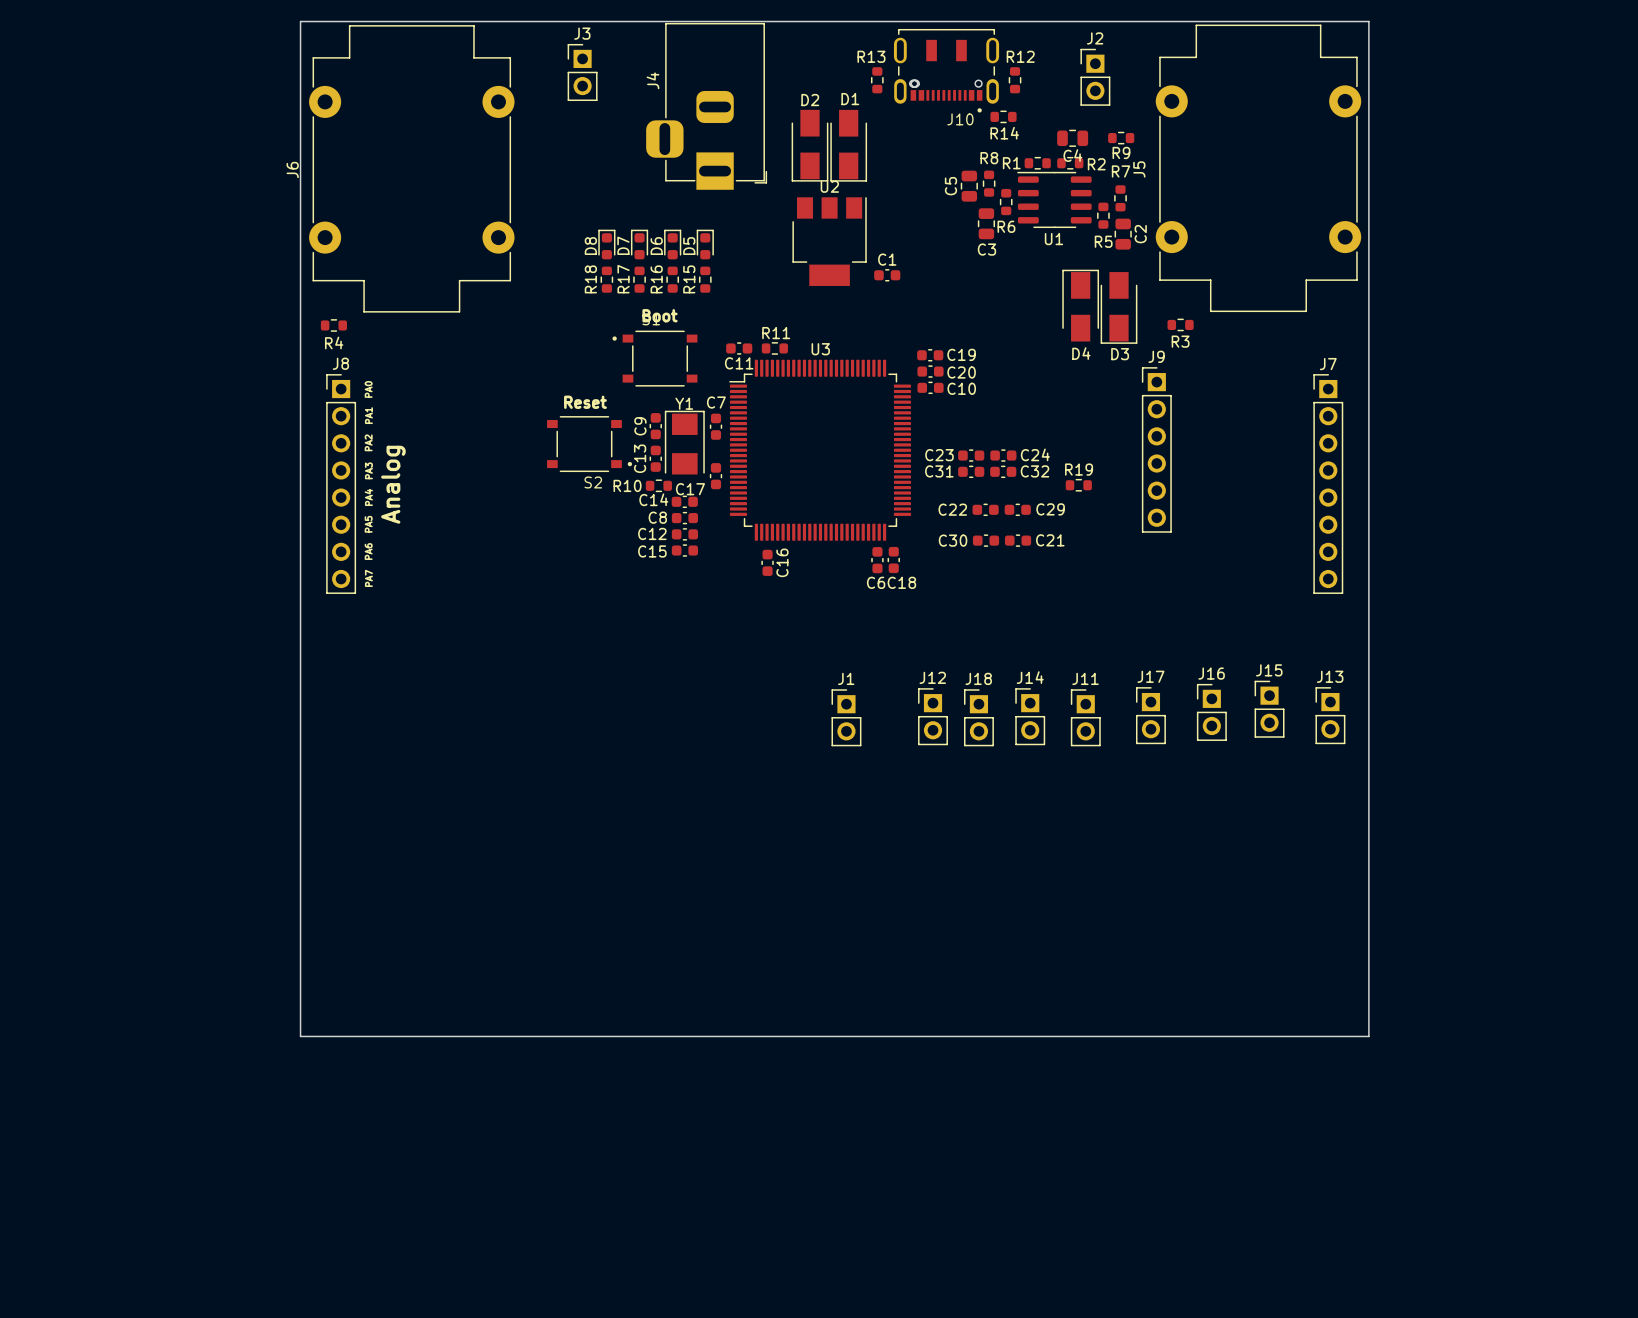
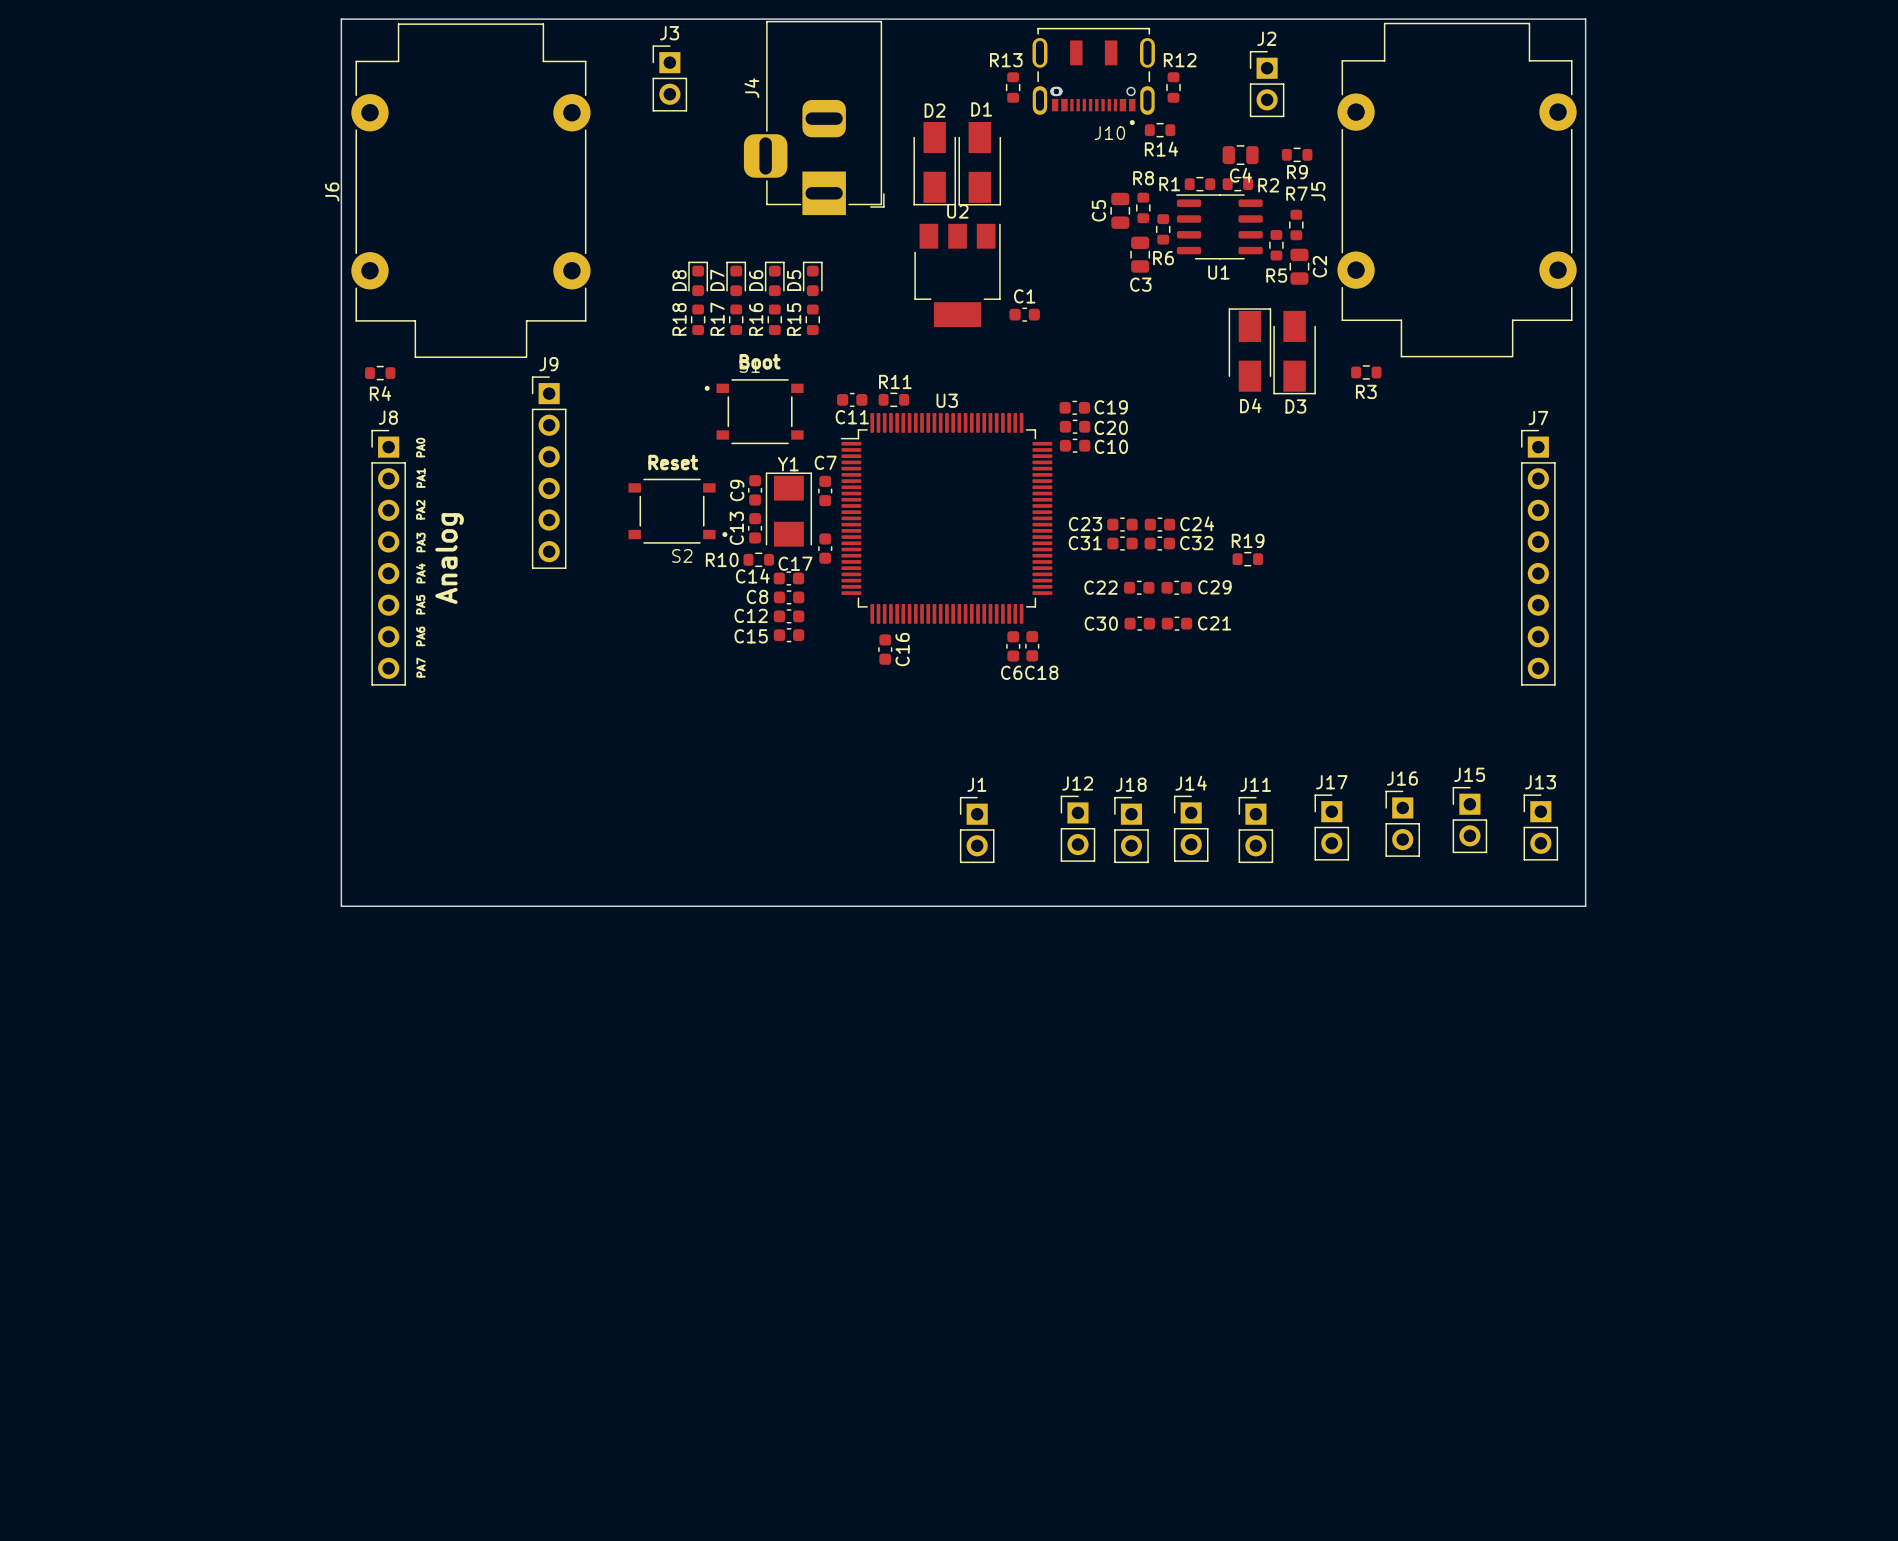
J9 position: (1156, 449) -> (549, 472)
board edge: (300, 783) (300, 1036) (1368, 1036) (1368, 783) -> (341, 906) (1585, 906)

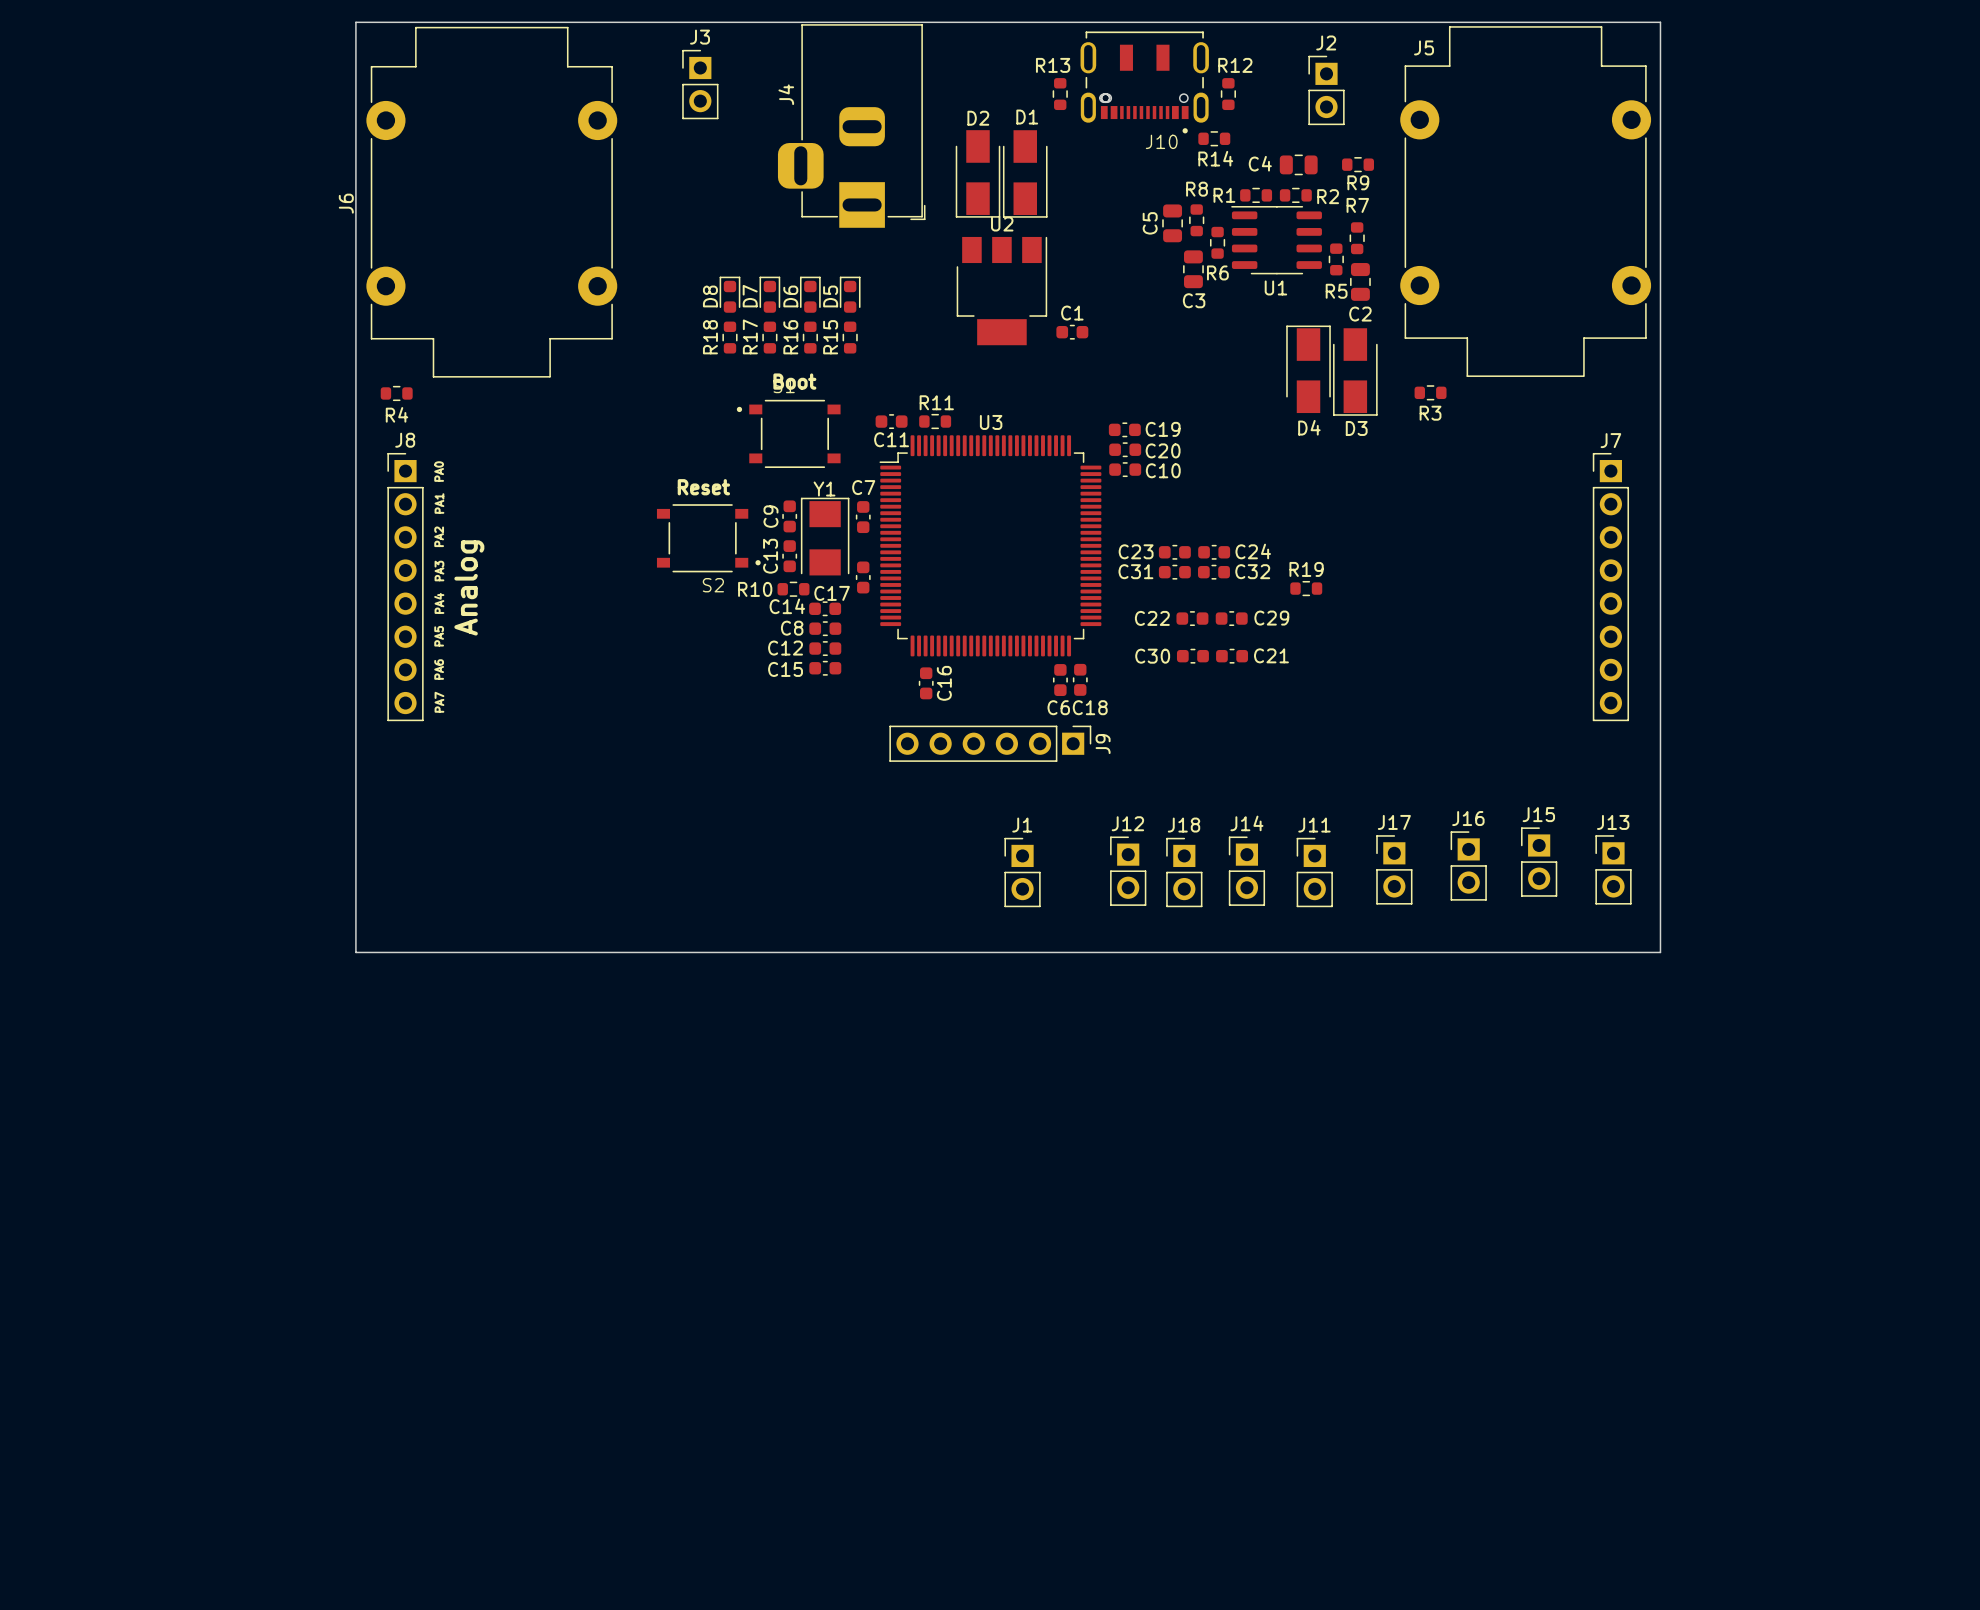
C4 name position: C4 (1240, 175) -> C4 (1260, 163)
J5 name rotation: 0° (1318, 191) -> 90° clockwise (1424, 47)
J5 name position: J5 (1318, 191) -> J5 (1424, 47)
C2 name rotation: 0° (1319, 266) -> 90° clockwise (1360, 314)
C2 name position: C2 (1319, 266) -> C2 (1360, 314)
J9 rotation: 0° (549, 472) -> 90° clockwise (990, 743)
J9 position: (549, 472) -> (990, 743)

